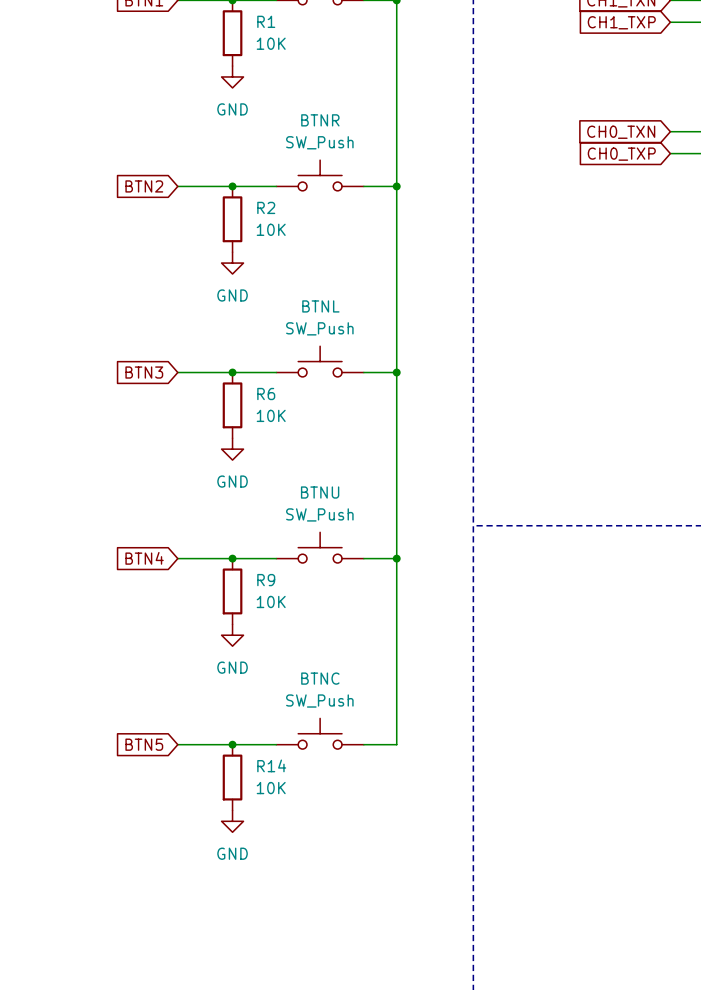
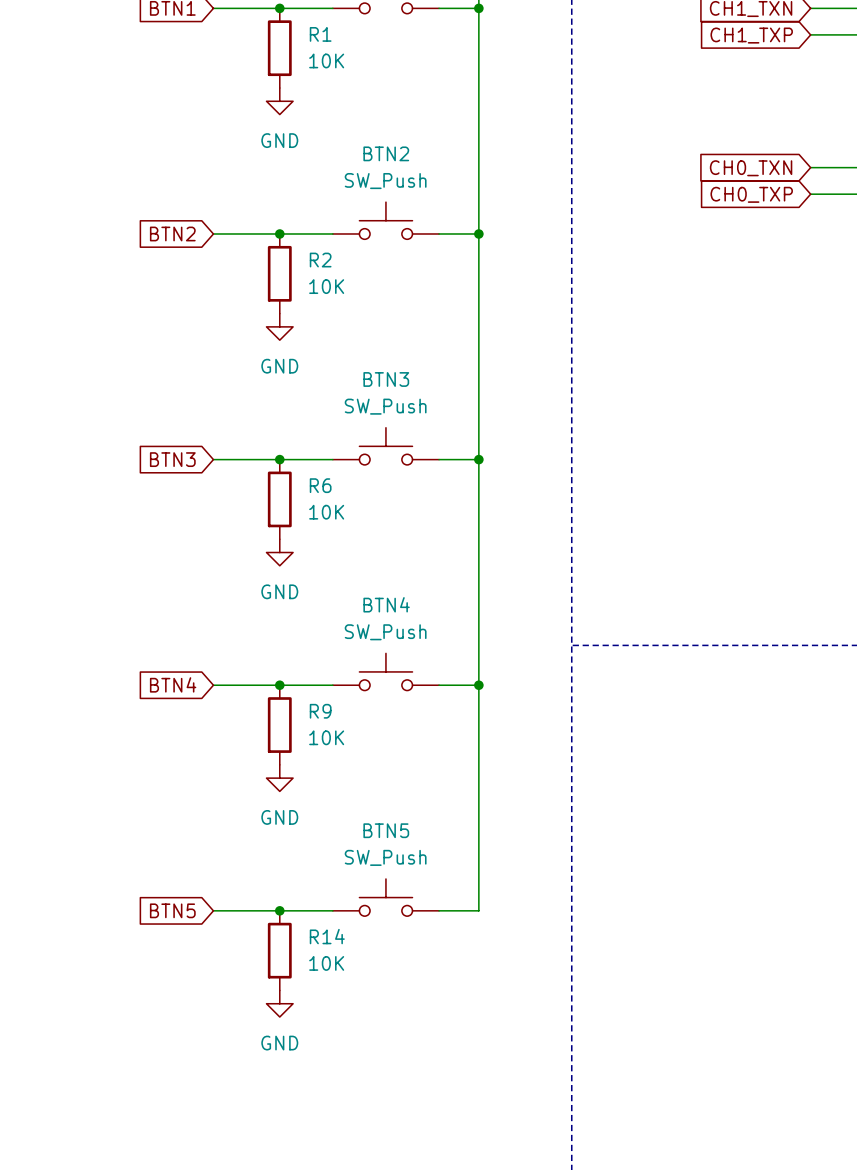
BTNR name: BTNR (320, 120) -> BTN2 (386, 153)
BTNL name: BTNL (320, 306) -> BTN3 (386, 379)
BTNU name: BTNU (320, 492) -> BTN4 (386, 604)
BTNC name: BTNC (320, 678) -> BTN5 (386, 830)

